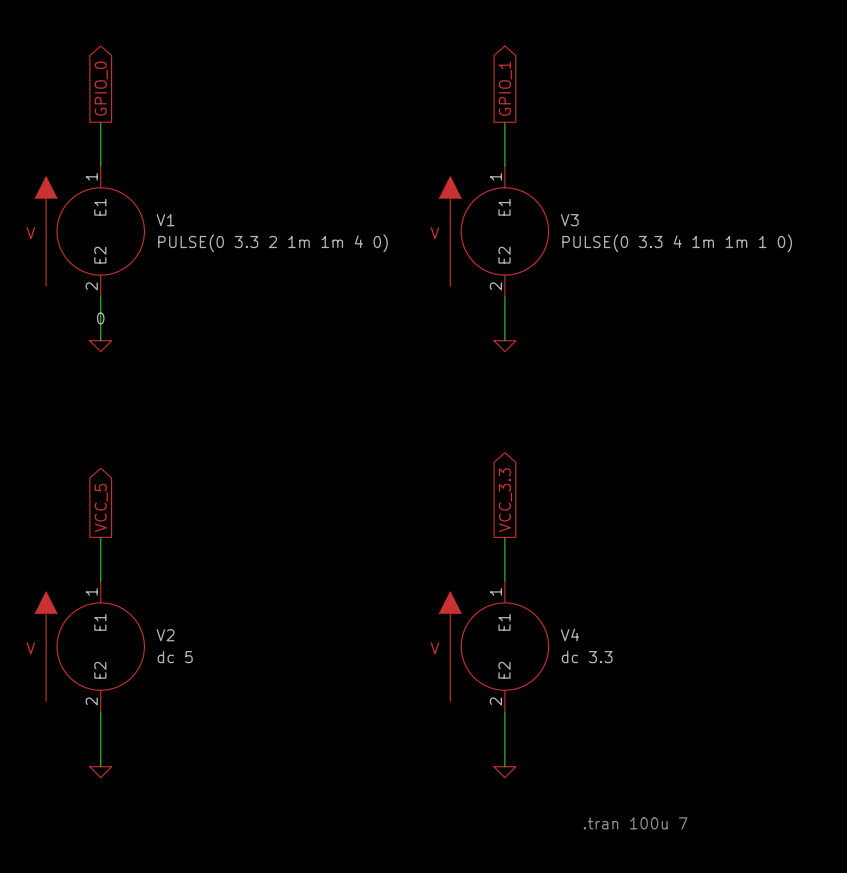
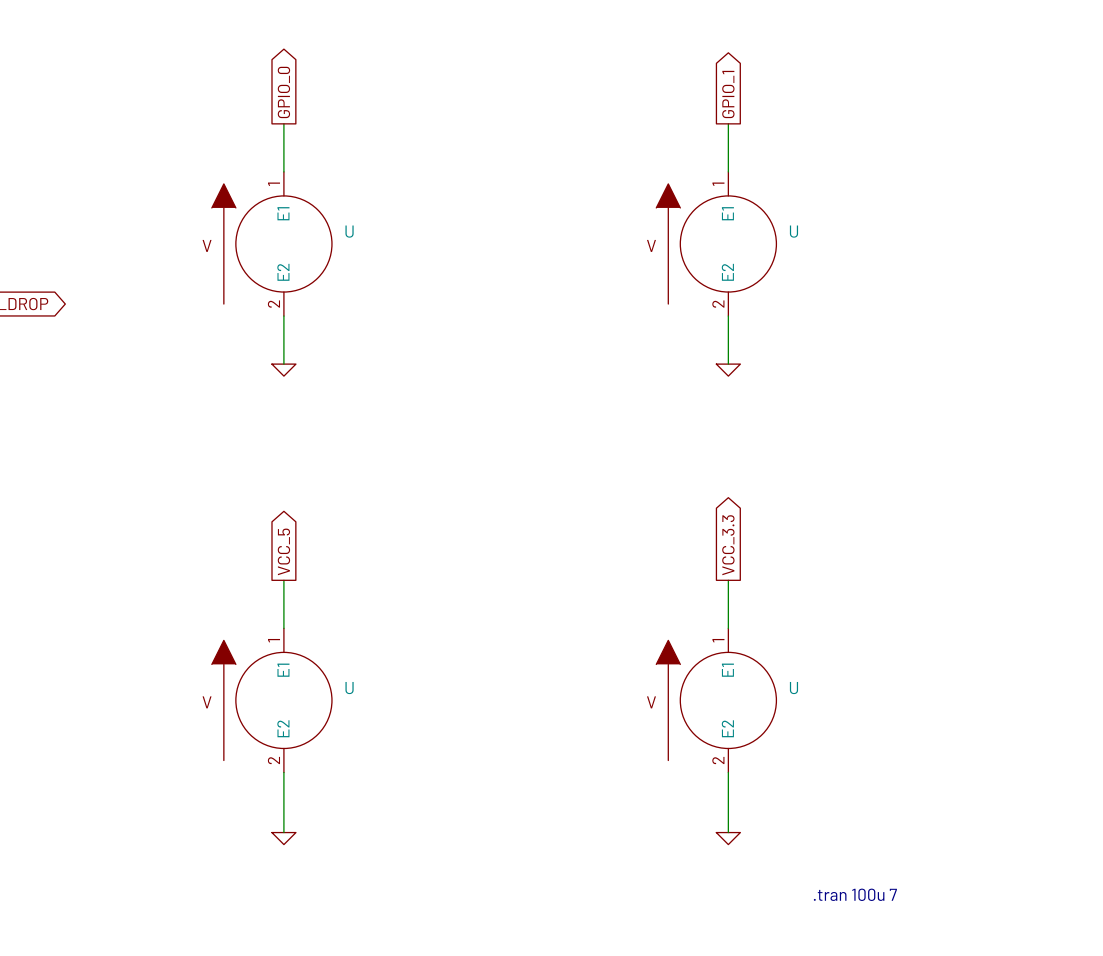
V1 name: V1 (165, 220) -> U (349, 231)
V3 name: V3 (569, 220) -> U (793, 231)
V1 value: PULSE(0 3.3 2 1m 1m 4 0) (273, 243) -> none
V3 value: PULSE(0 3.3 4 1m 1m 1 0) (677, 243) -> none
power symbol text: 0 (100, 318) -> none
V4 name: V4 (570, 634) -> U (793, 688)
V2 name: V2 (165, 635) -> U (349, 688)
V2 value: dc 5 (175, 657) -> none
V4 value: dc 3.3 (587, 657) -> none

